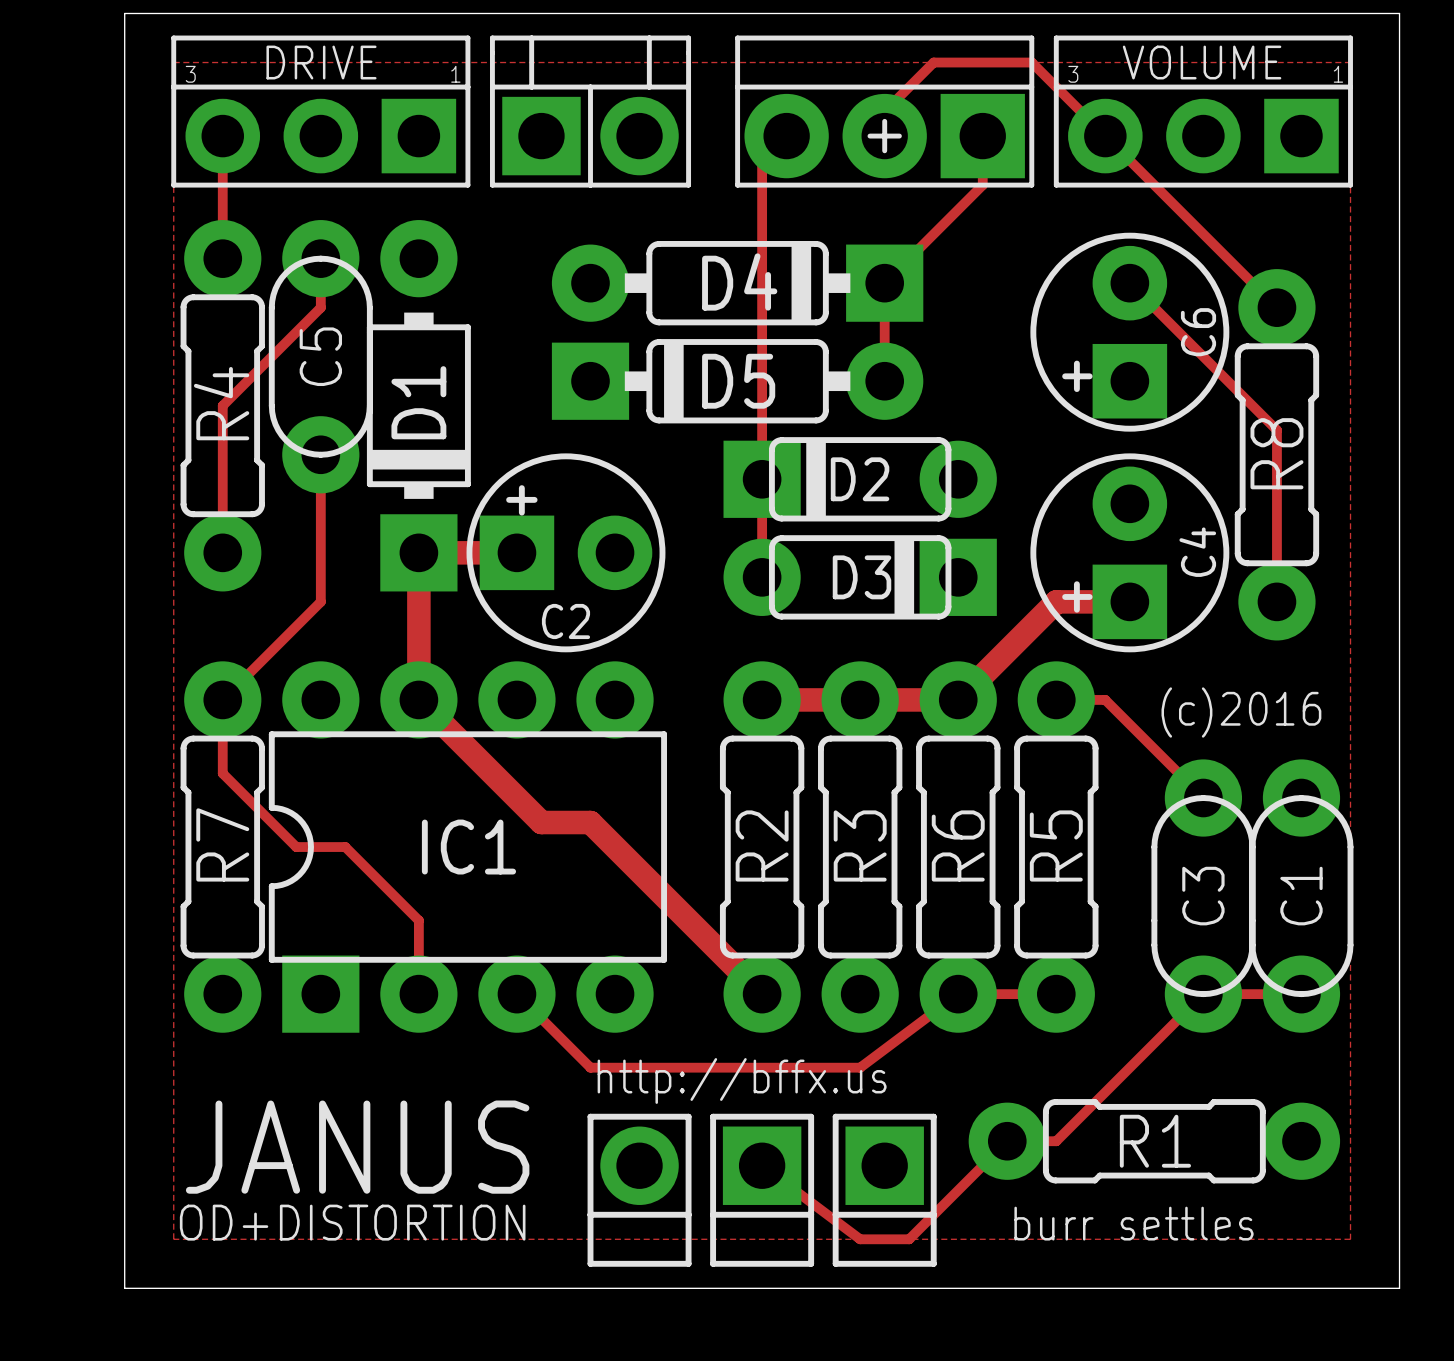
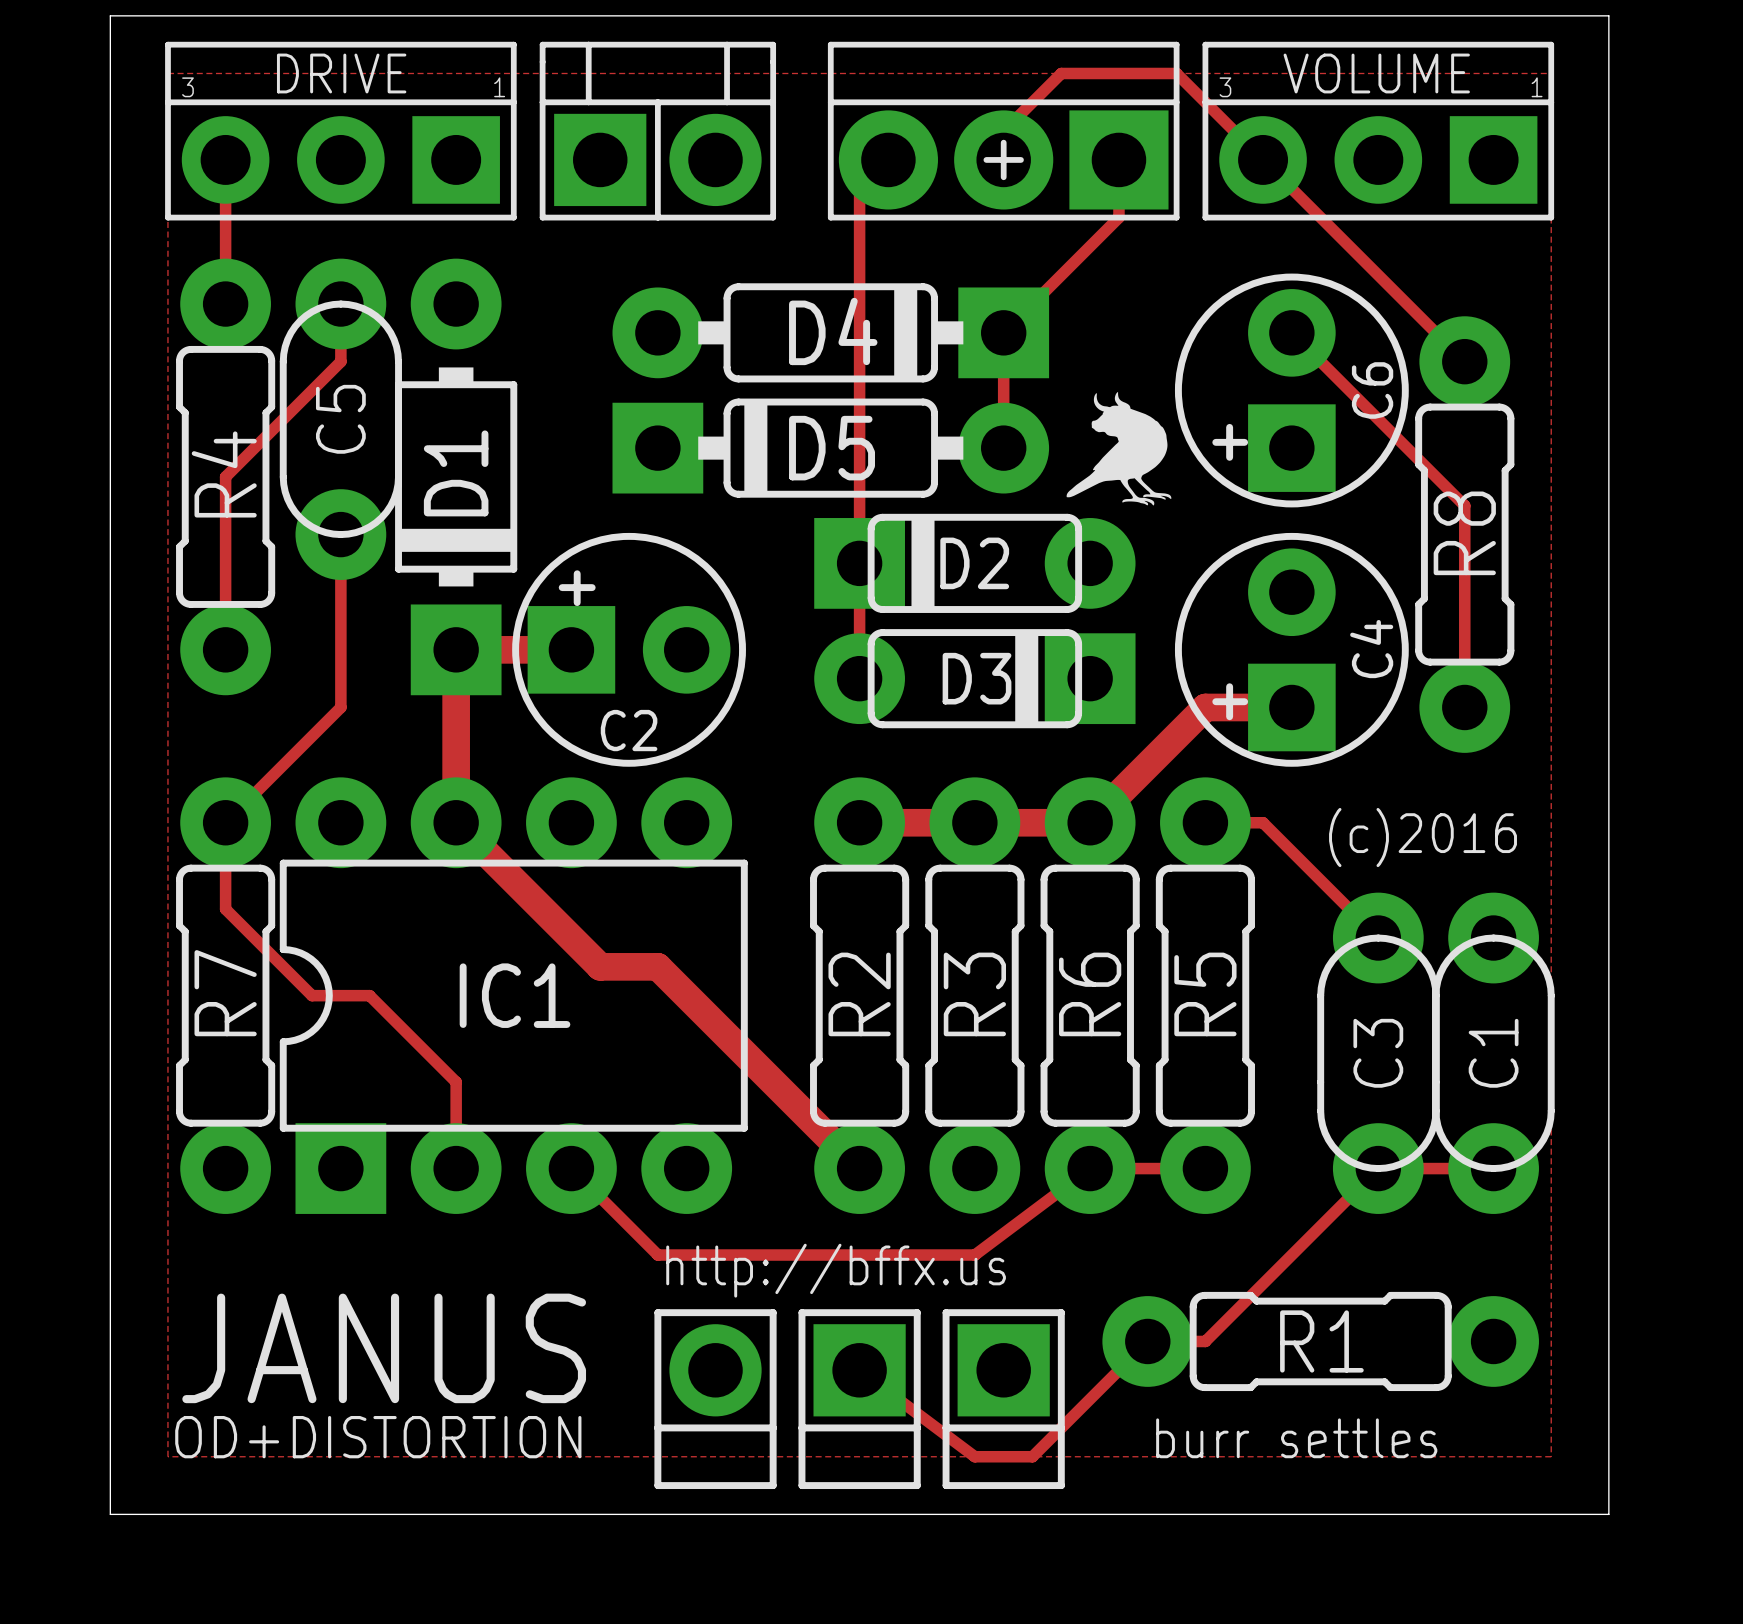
drawing: none -> [1066, 390, 1172, 506]

